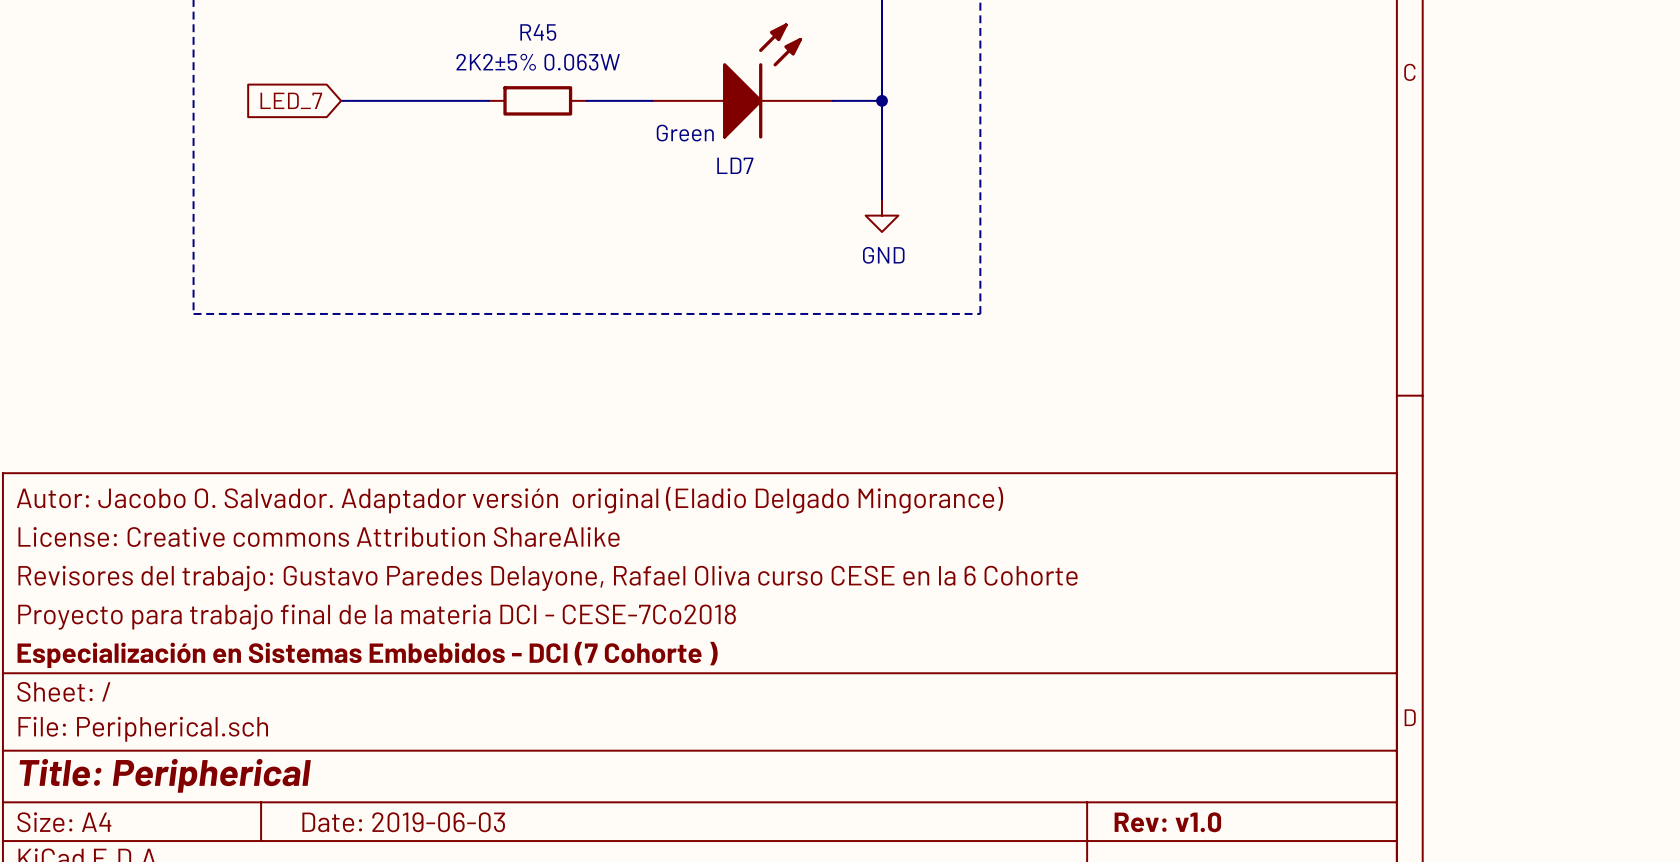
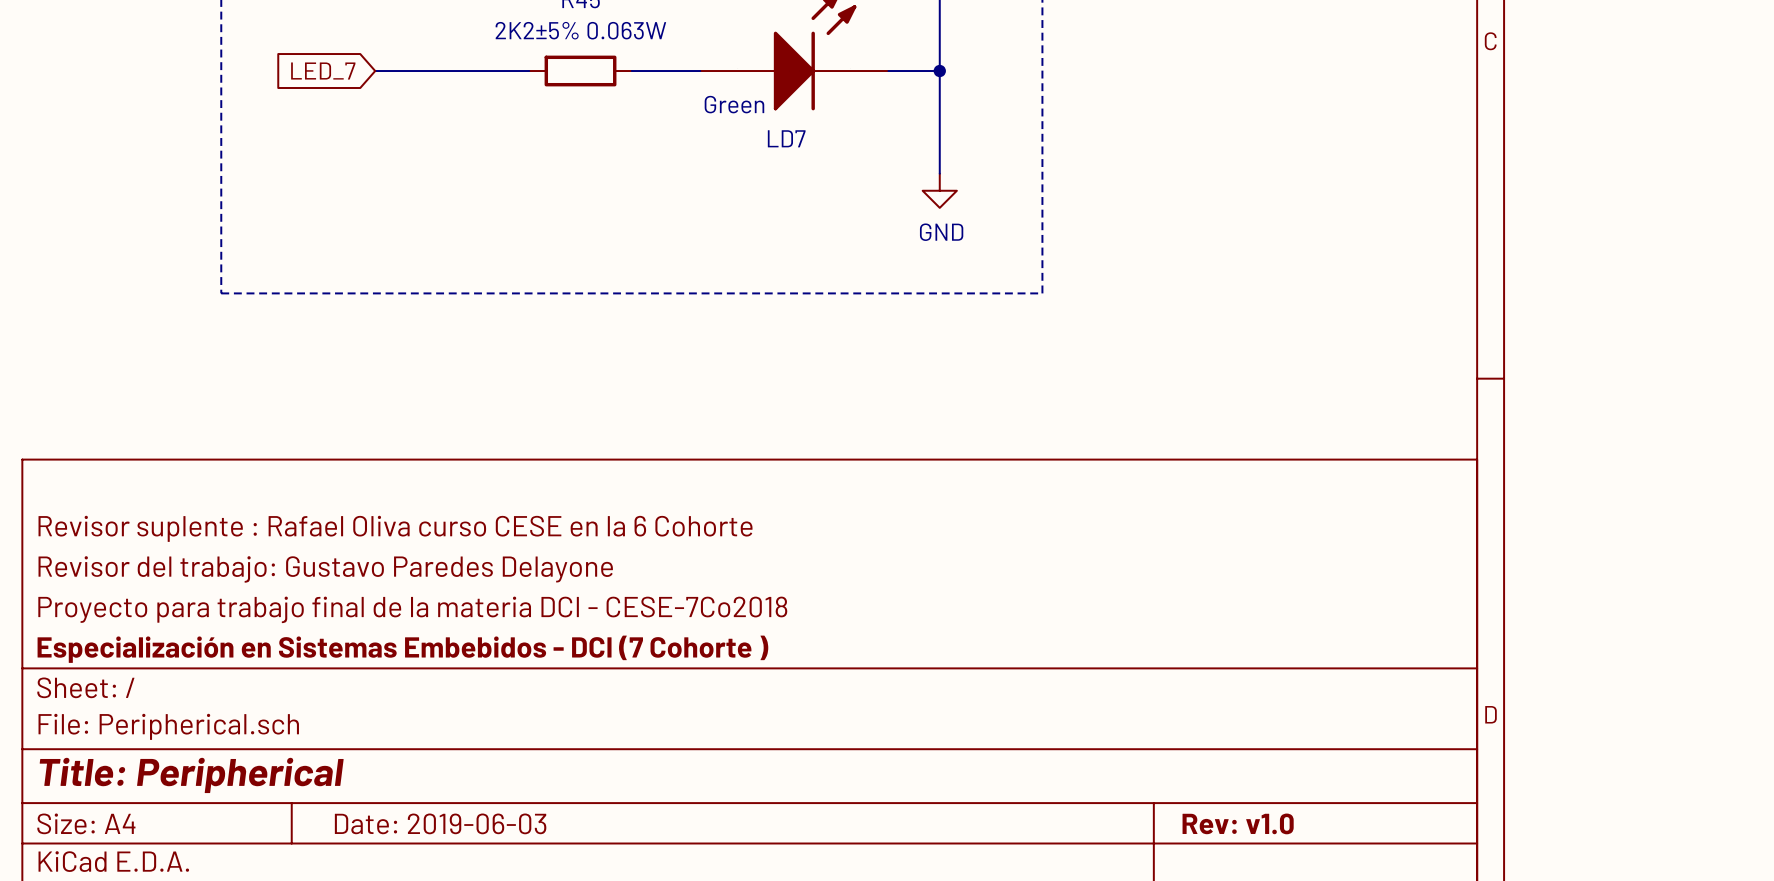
title block: Autor: Jacobo O. Salvador. Adaptador versión original (Eladio Delgado Mingorance) (509, 500) -> none
title block: License: Creative commons Attribution ShareAlike (319, 536) -> Revisor suplente : Rafael Oliva curso CESE en la 6 Cohorte (395, 528)
title block: Revisores del trabajo: Gustavo Paredes Delayone, Rafael Oliva curso CESE en la 6 Cohorte (548, 578) -> Revisor del trabajo: Gustavo Paredes Delayone (325, 569)

